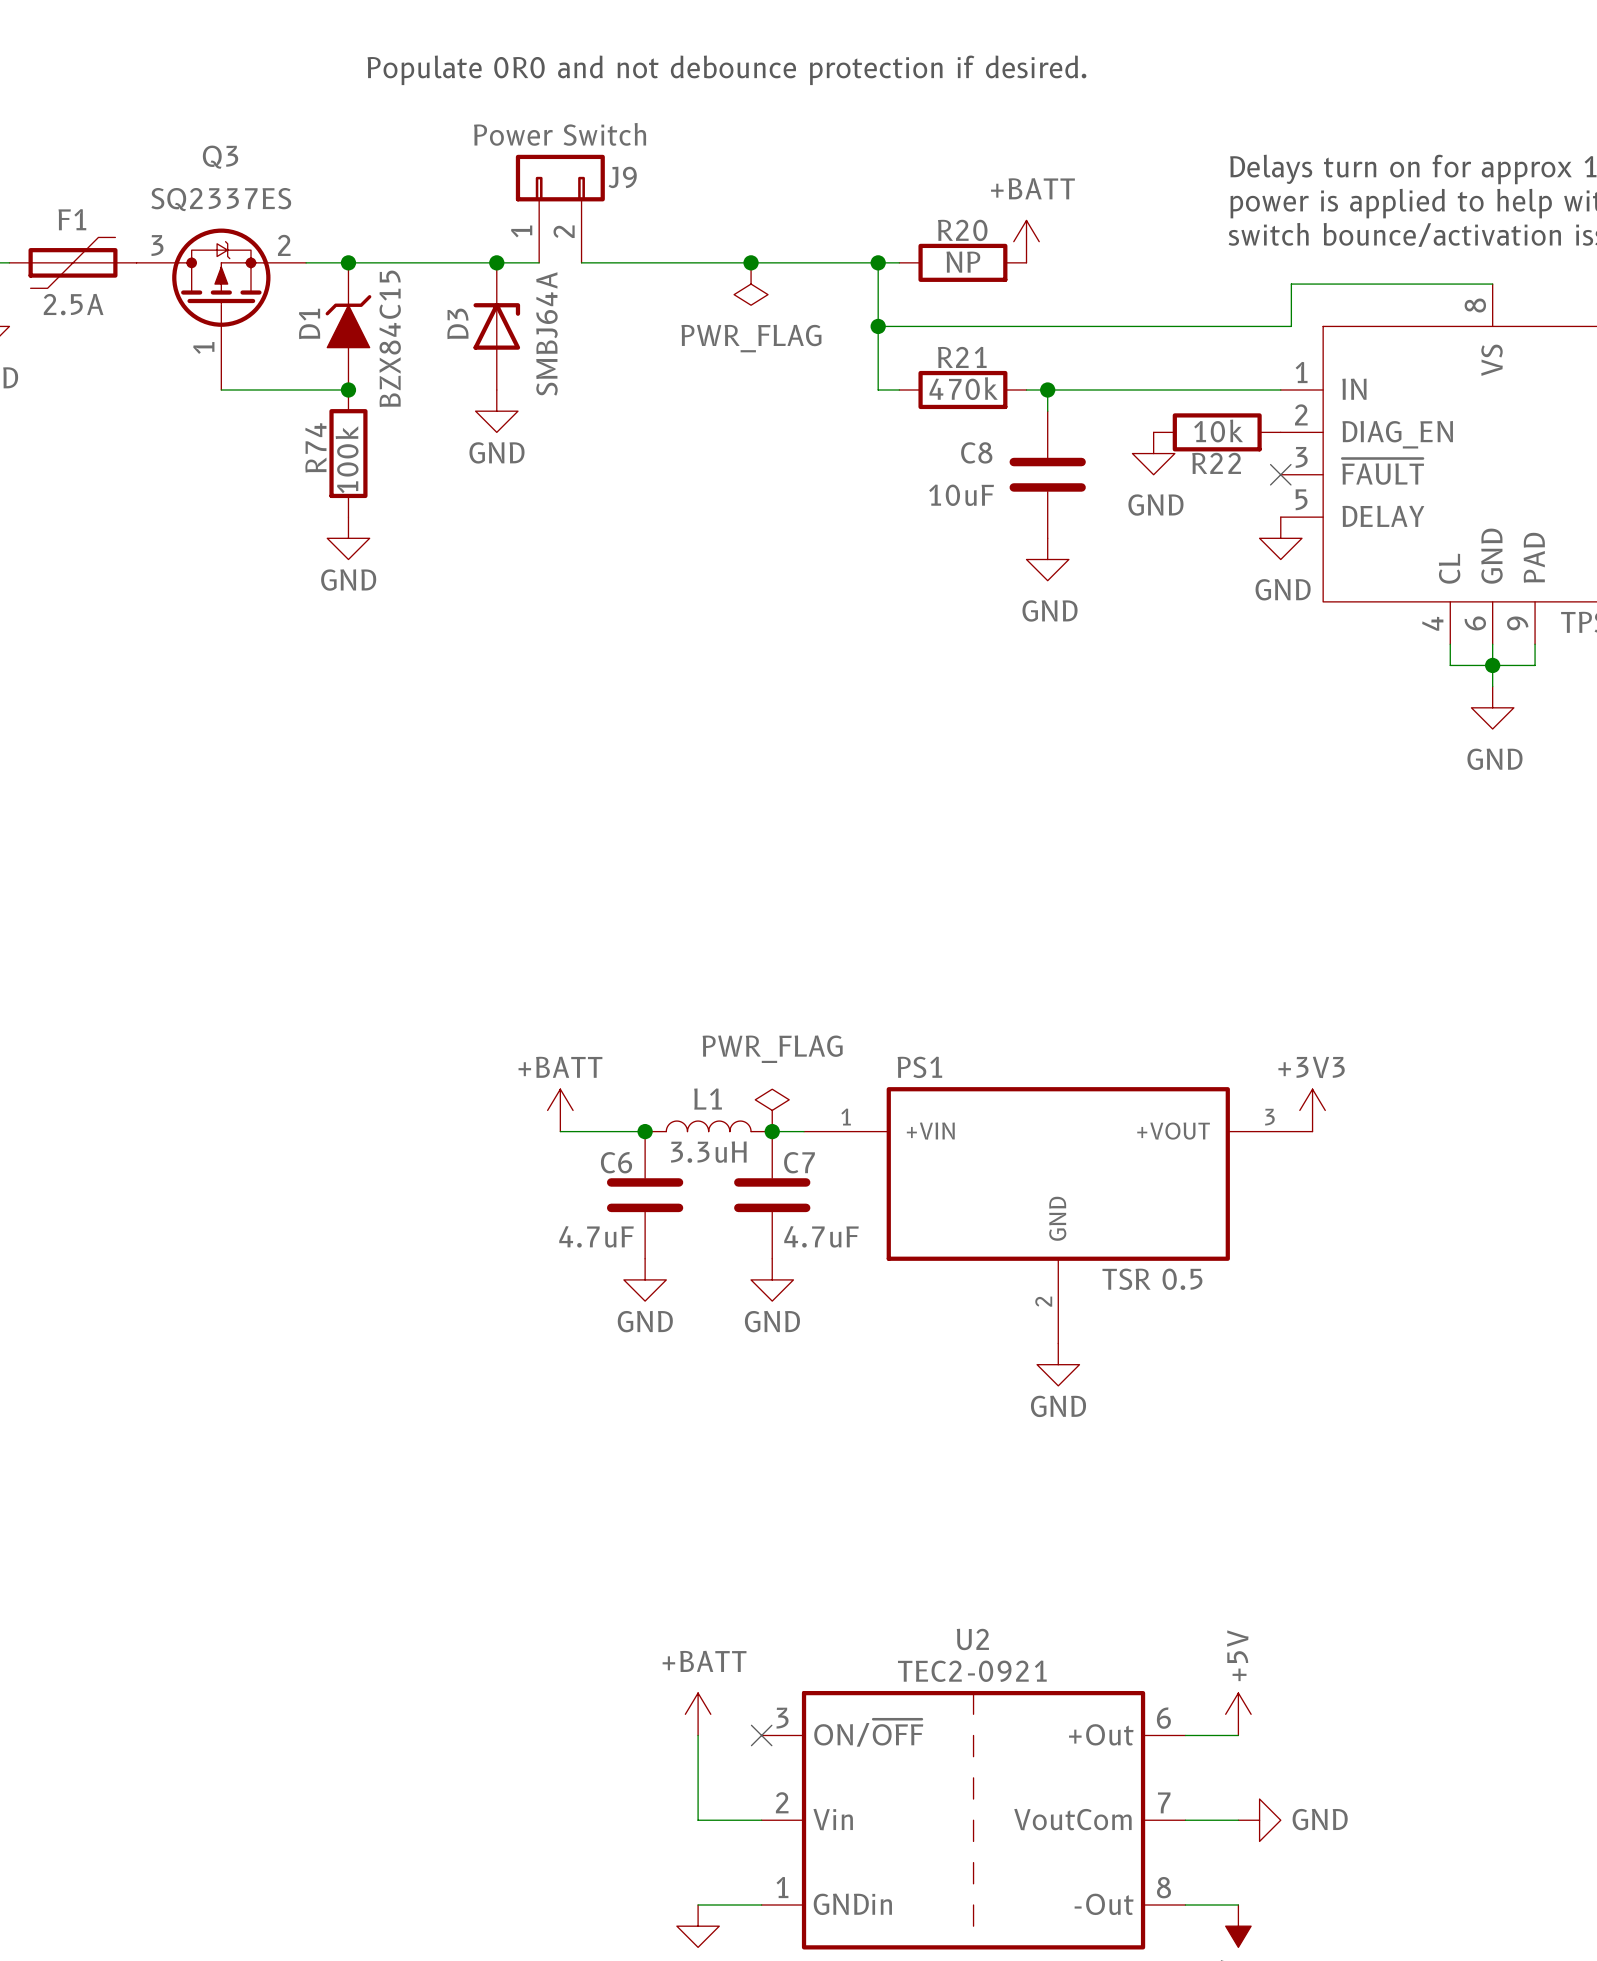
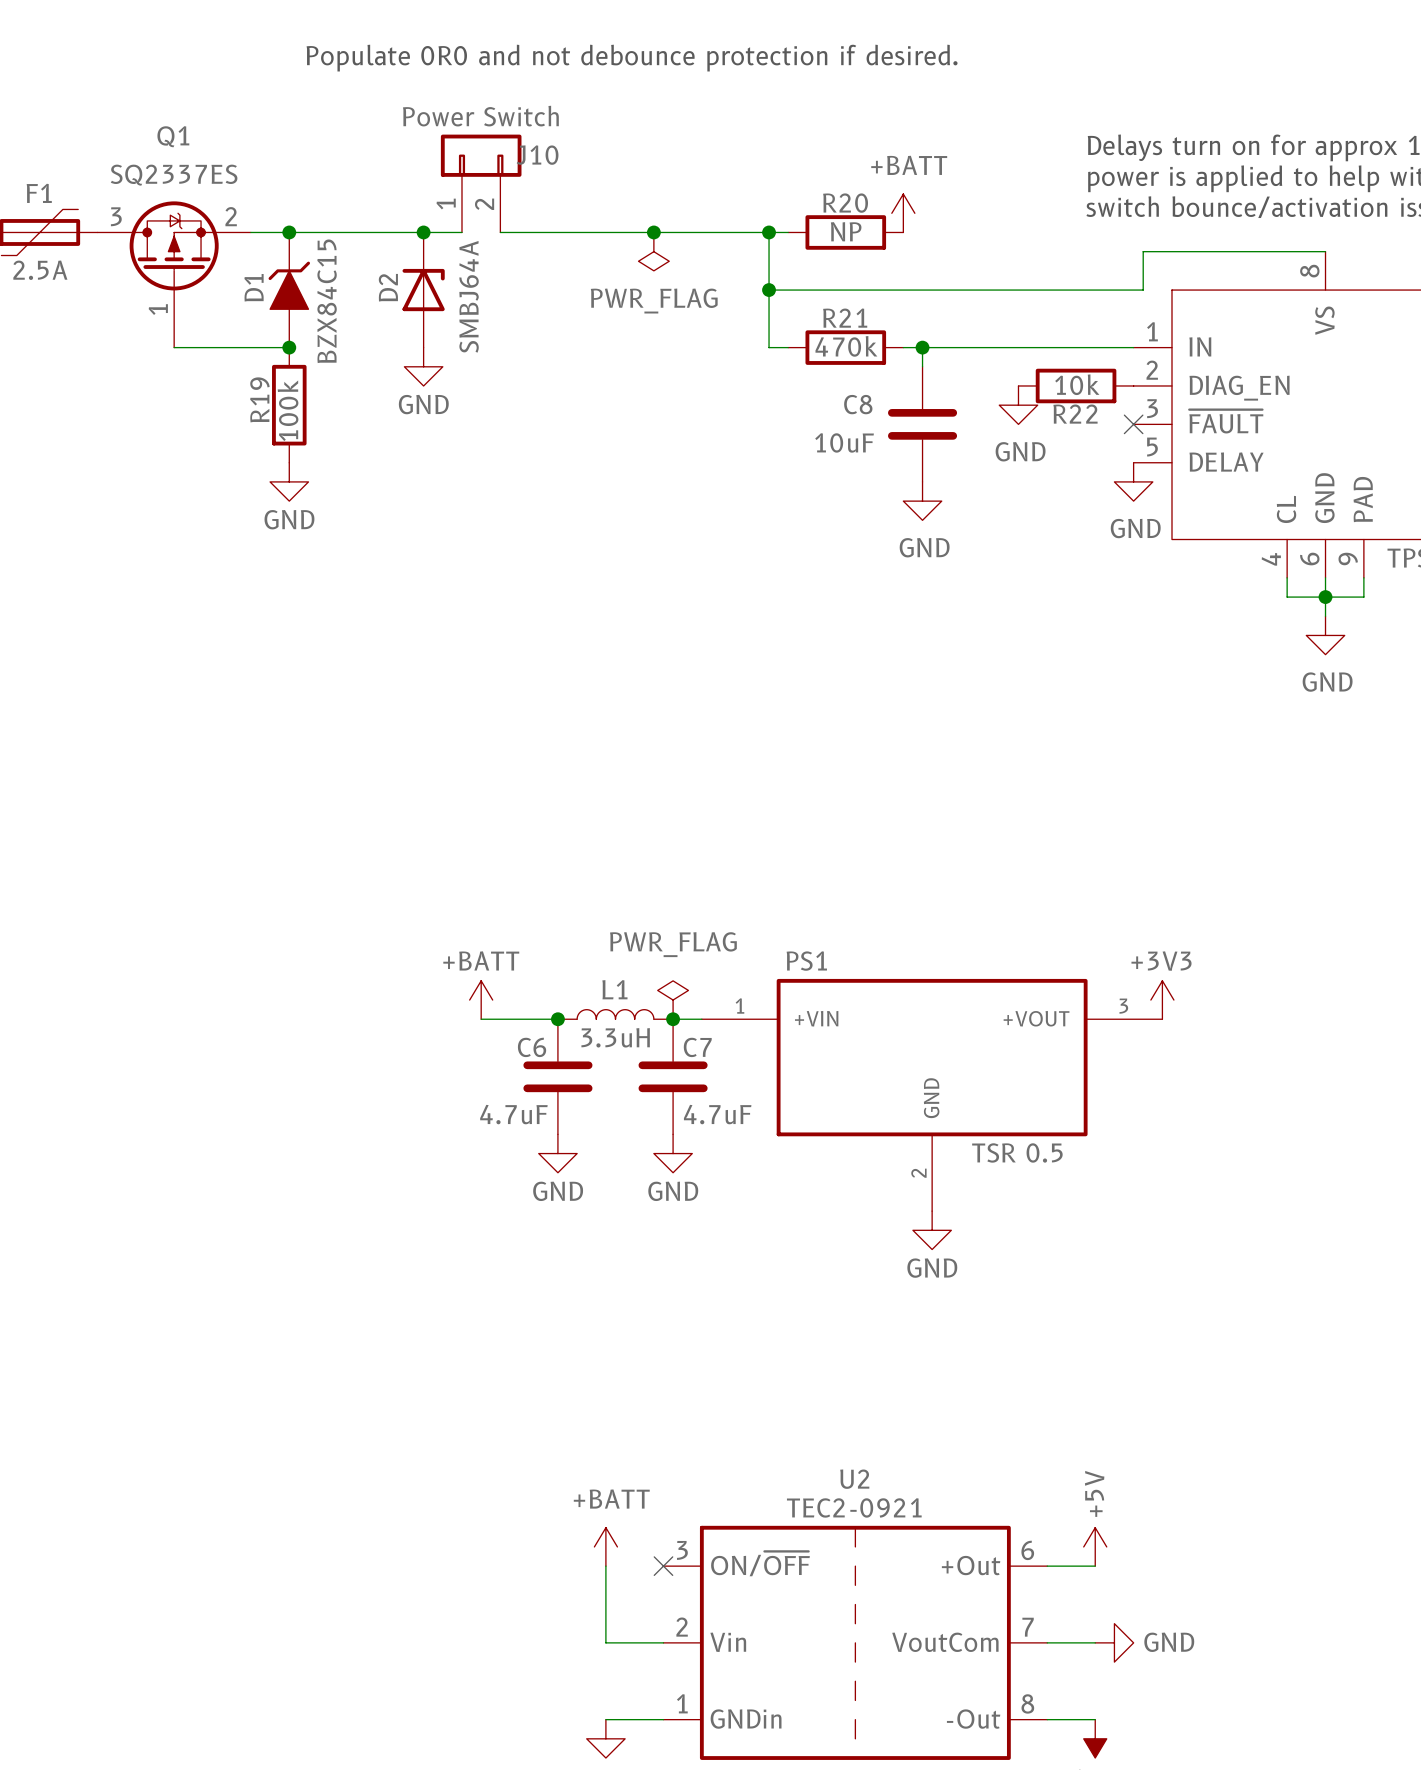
Q3 name: Q3 (220, 157) -> Q1 (173, 136)
J9 name: J9 (622, 177) -> J10 (537, 155)
D3 name: D3 (457, 323) -> D2 (388, 287)
R74 name: R74 (315, 447) -> R19 (259, 399)

